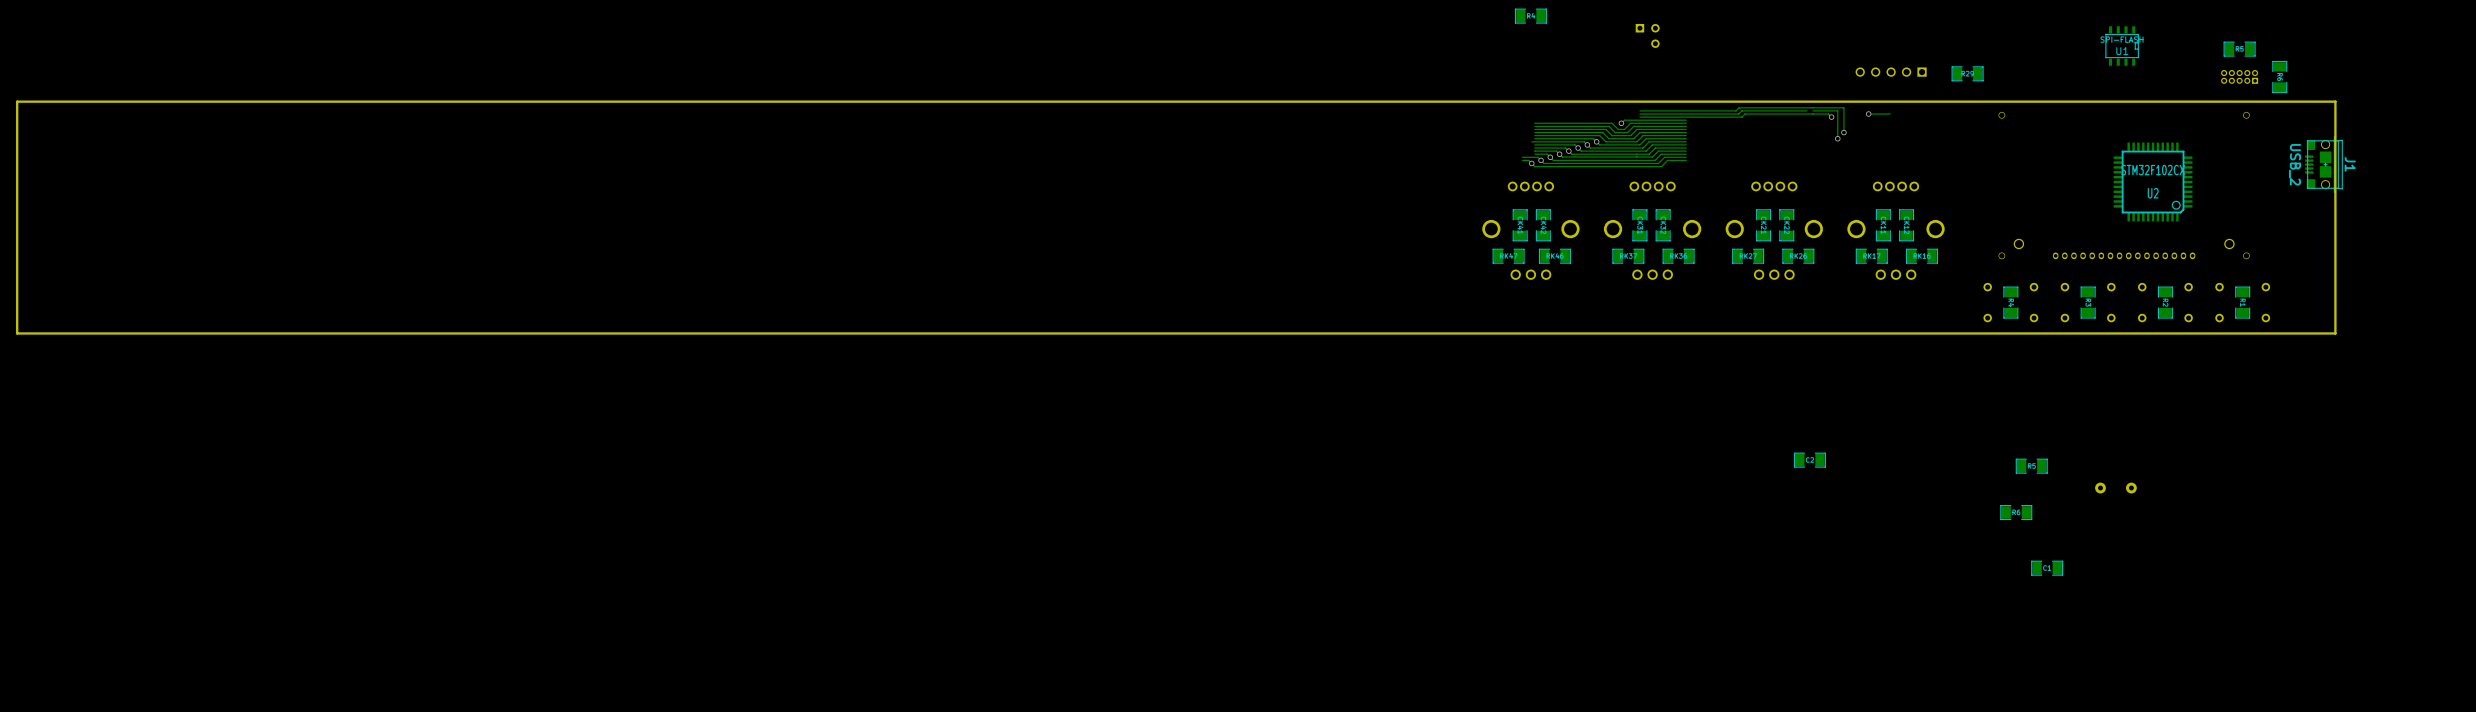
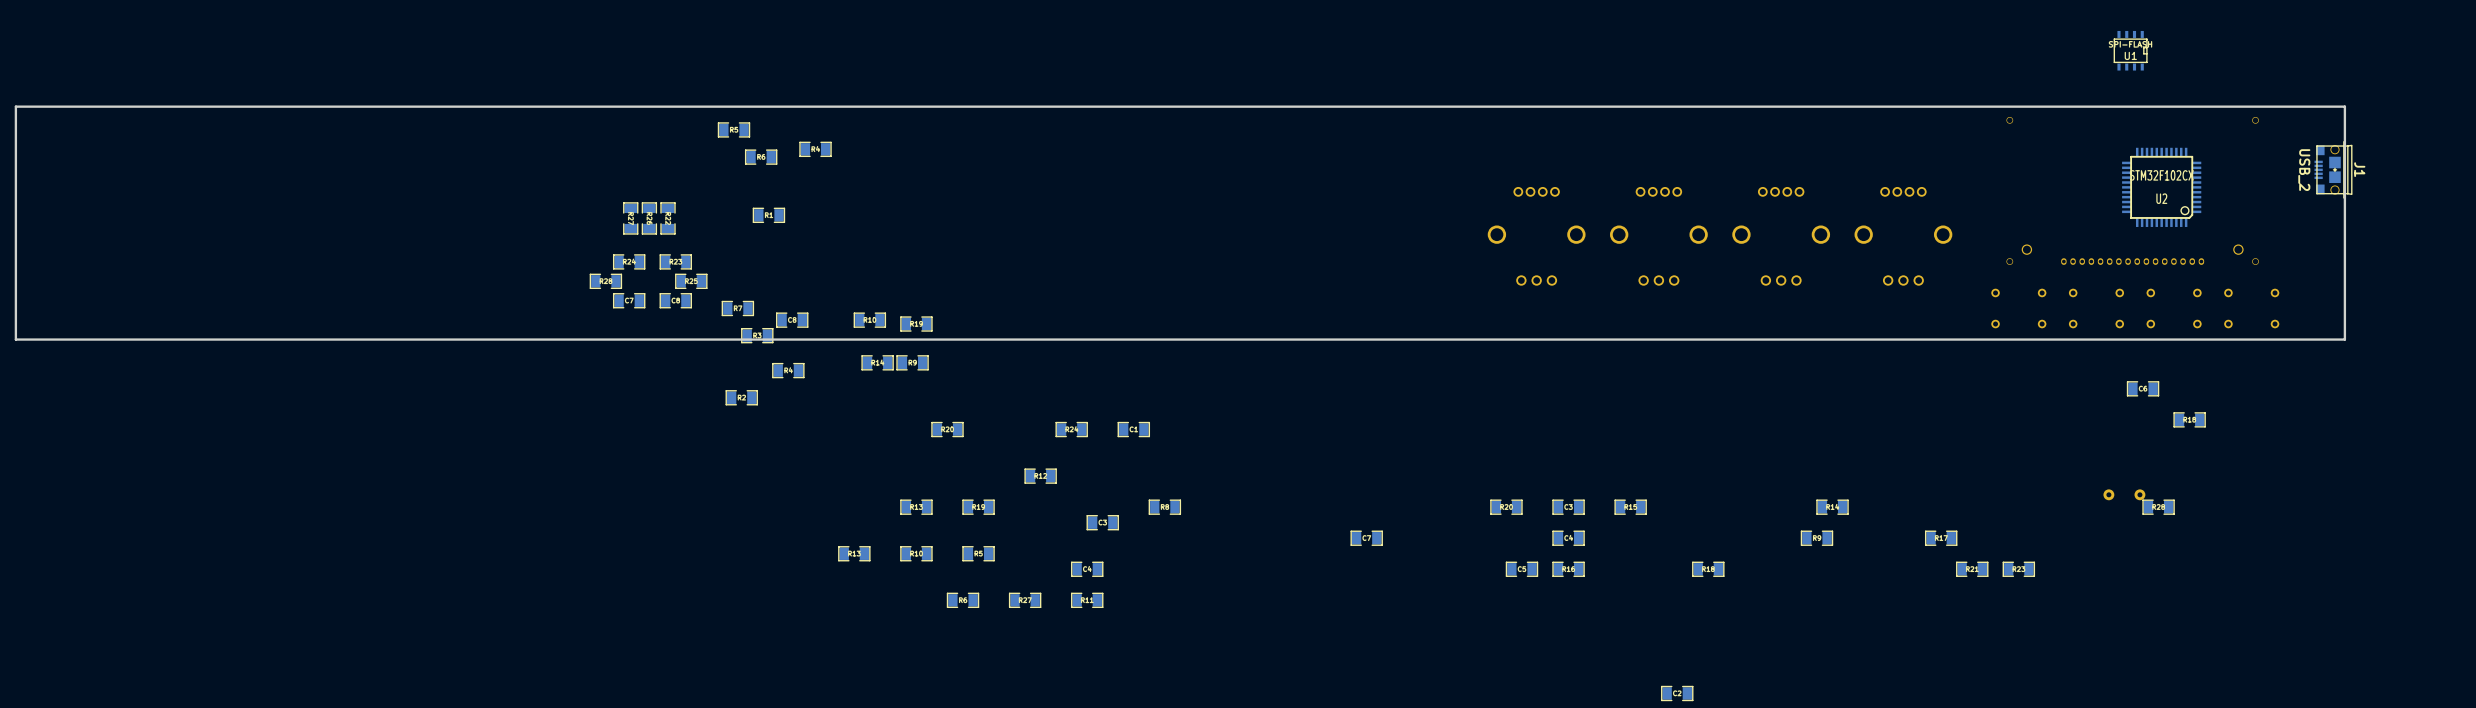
part: (1530, 16) -> none
part: (1647, 35) -> none
part: (2239, 49) -> none
part: (1891, 72) -> none
part: (1967, 73) -> none
part: (2239, 76) -> none
part: (2279, 76) -> none
track: (1639, 110) (1736, 110) (1739, 107) (1843, 107) (1843, 132) -> none
track: (1806, 110) (1741, 110) (1738, 114) (1639, 114) -> none
track: (1813, 110) (1837, 110) (1837, 138) -> none
via: (1868, 114) -> none
track: (1890, 114) (1868, 114) -> none
track: (1831, 117) (1828, 114) (1745, 114) (1741, 117) (1639, 117) -> none
via: (1831, 117) -> none
track: (1686, 120) (1624, 120) (1621, 123) -> none
via: (1621, 123) -> none
track: (1686, 123) (1630, 123) (1624, 129) (1618, 129) (1612, 123) (1534, 123) -> none
part: none -> (733, 129)
track: (1686, 126) (1633, 126) (1627, 132) (1615, 132) (1609, 126) (1534, 126) -> none
track: (1686, 129) (1636, 129) (1630, 135) (1612, 135) (1605, 129) (1534, 129) -> none
track: (1686, 132) (1639, 132) (1633, 138) (1609, 138) (1602, 132) (1534, 132) -> none
via: (1843, 132) -> none
track: (1686, 135) (1643, 135) (1636, 141) (1605, 141) (1599, 135) (1534, 135) -> none
track: (1686, 138) (1646, 138) (1639, 144) (1599, 144) (1593, 138) (1534, 138) -> none
via: (1837, 138) -> none
via: (1596, 141) -> none
track: (1686, 141) (1649, 141) (1643, 148) (1590, 148) (1584, 141) (1531, 141) -> none
part: none -> (815, 149)
via: (1587, 144) -> none
track: (1686, 144) (1652, 144) (1646, 151) (1581, 151) (1575, 144) (1534, 144) -> none
via: (1578, 148) -> none
track: (1686, 148) (1655, 148) (1649, 154) (1571, 154) (1565, 148) (1534, 148) -> none
track: (1534, 150) (1556, 151) (1562, 157) (1652, 157) (1658, 151) (1686, 151) -> none
part: none -> (761, 157)
via: (1568, 151) -> none
via: (1559, 154) -> none
track: (1686, 154) (1661, 154) (1655, 160) (1553, 160) (1547, 154) (1534, 154) -> none
via: (1550, 157) -> none
track: (1686, 157) (1664, 157) (1658, 163) (1544, 163) (1537, 157) (1522, 157) -> none
via: (1541, 160) -> none
track: (1686, 160) (1667, 160) (1661, 166) (1534, 166) (1528, 160) (1522, 160) -> none
via: (1531, 163) -> none
part: none -> (630, 218)
part: none -> (649, 218)
part: none -> (668, 218)
part: (1520, 225) -> none
part: (1543, 225) -> none
part: (1639, 225) -> none
part: (1663, 225) -> none
part: (1763, 225) -> none
part: (1786, 225) -> none
part: (1883, 225) -> none
part: (1906, 225) -> none
part: none -> (629, 261)
part: none -> (675, 261)
part: (1508, 256) -> none
part: (1554, 256) -> none
part: (1628, 256) -> none
part: (1678, 256) -> none
part: (1748, 256) -> none
part: (1798, 256) -> none
part: (1871, 256) -> none
part: (1922, 256) -> none
part: none -> (605, 281)
part: none -> (691, 281)
part: none -> (629, 300)
part: none -> (675, 300)
part: none -> (737, 308)
part: (2010, 302) -> none
part rotation: 0° (2088, 302) -> 90° clockwise (757, 335)
part position: (2088, 302) -> (757, 335)
part rotation: 0° (2165, 302) -> 90° clockwise (741, 397)
part position: (2165, 302) -> (741, 397)
part rotation: 0° (2242, 302) -> 90° clockwise (768, 215)
part position: (2242, 302) -> (768, 215)
part: none -> (792, 320)
part: none -> (869, 320)
part: none -> (916, 324)
part: none -> (877, 362)
part: none -> (912, 362)
part: none -> (788, 370)
part: none -> (2143, 388)
part: none -> (2189, 419)
part: none -> (947, 429)
part: none -> (1071, 429)
part position: (1809, 460) -> (1677, 693)
part: (2031, 466) -> none
part: none -> (1040, 476)
part: none -> (916, 507)
part: none -> (978, 507)
part: none -> (1164, 507)
part: none -> (1506, 507)
part: none -> (1568, 507)
part: none -> (1630, 507)
part: none -> (1832, 507)
part: none -> (2158, 507)
part: (2016, 512) -> none
part: none -> (1102, 522)
part: none -> (1366, 538)
part: none -> (1568, 538)
part: none -> (1816, 538)
part: none -> (1941, 538)
part: none -> (854, 553)
part: none -> (916, 553)
part: none -> (978, 553)
part: none -> (1087, 569)
part: none -> (1521, 569)
part: none -> (1568, 569)
part: none -> (1708, 569)
part: none -> (1972, 569)
part: none -> (2018, 569)
part position: (2047, 568) -> (1133, 429)
part: none -> (963, 600)
part: none -> (1025, 600)
part: none -> (1087, 600)

